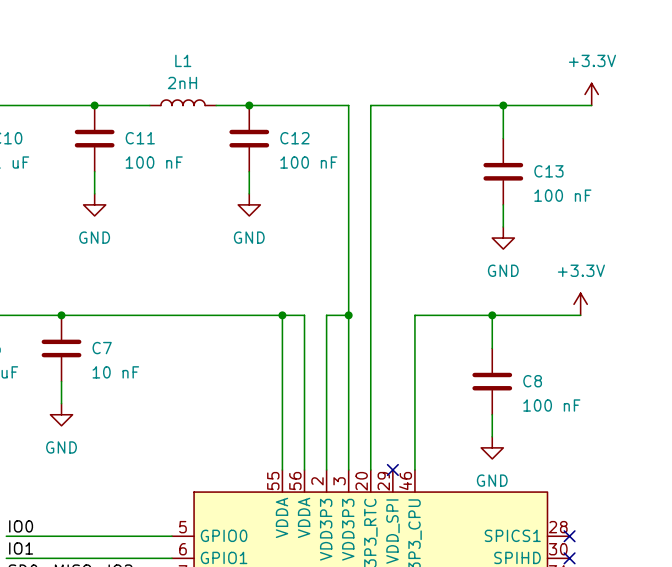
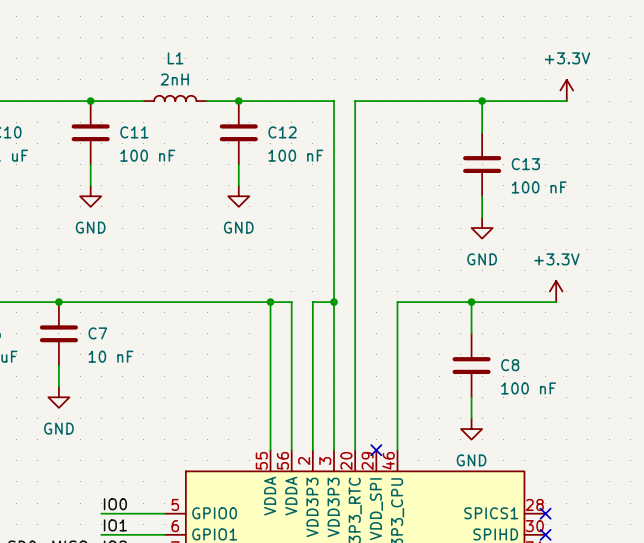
label position: IO0 (21, 526) -> IO0 (115, 504)
wire: (6, 536) (105, 536) -> none
label position: IO1 (21, 548) -> IO1 (115, 525)
wire: (6, 558) (105, 558) -> none

